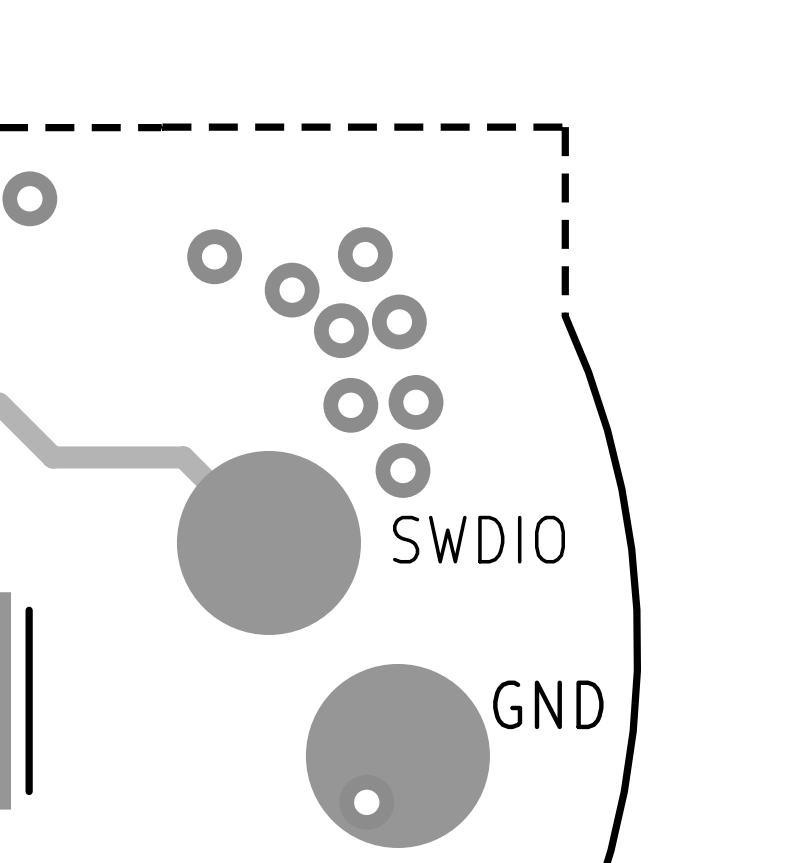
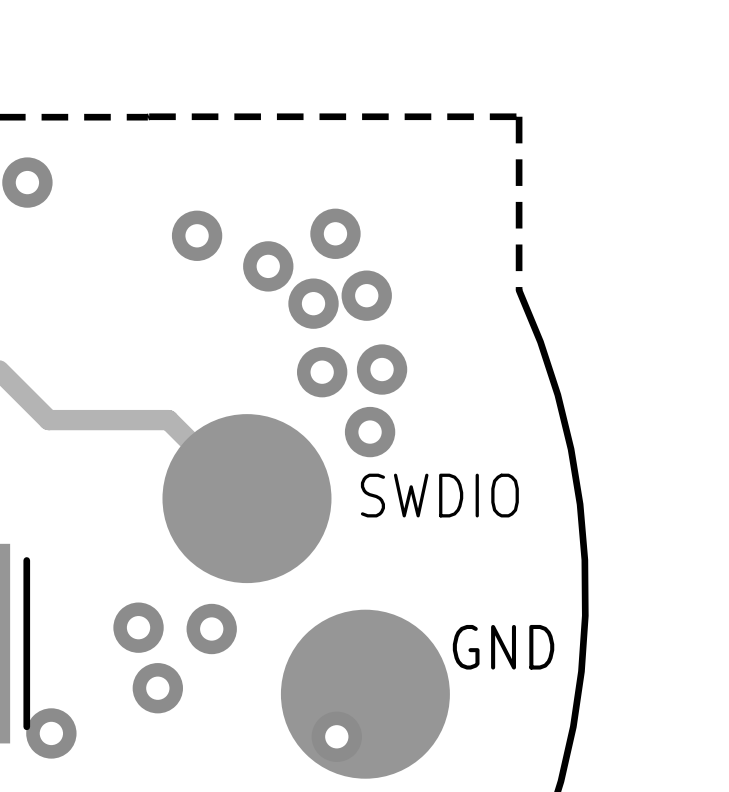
via: none -> (138, 627)
via: none -> (211, 629)
via: none -> (157, 688)
via: none -> (51, 733)

